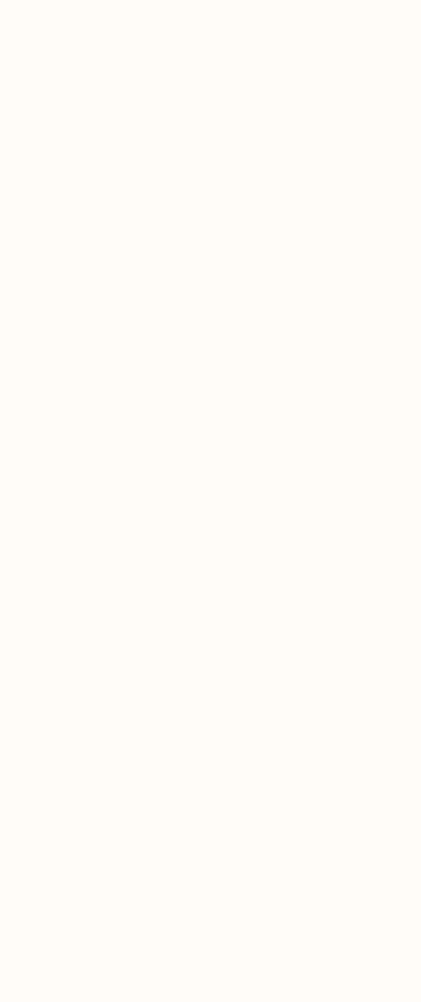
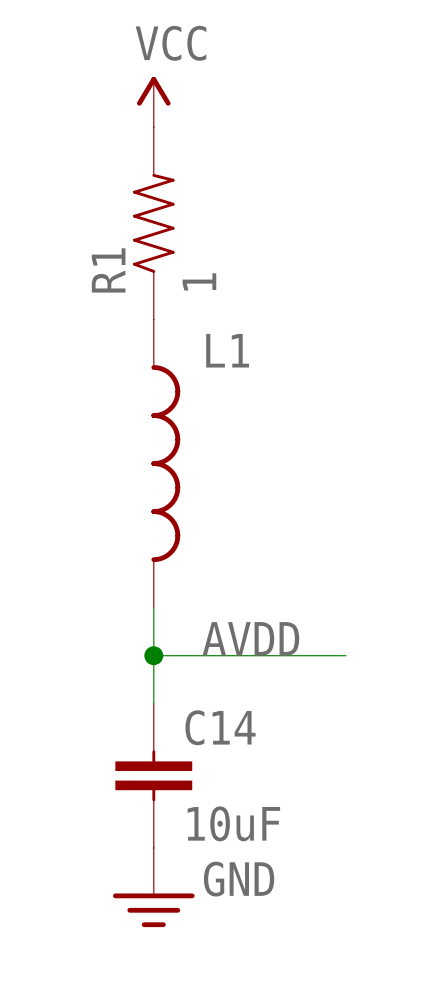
power symbol: none -> VCC (153, 102)
R1: none -> 1 (153, 223)
L1: none -> (165, 463)
wire: none -> (153, 607) (153, 703)
label: none -> AVDD (250, 638)
wire: none -> (153, 655) (345, 655)
junction: none -> (153, 655)
C14: none -> 10uF (153, 775)
power symbol: none -> GND (153, 887)

